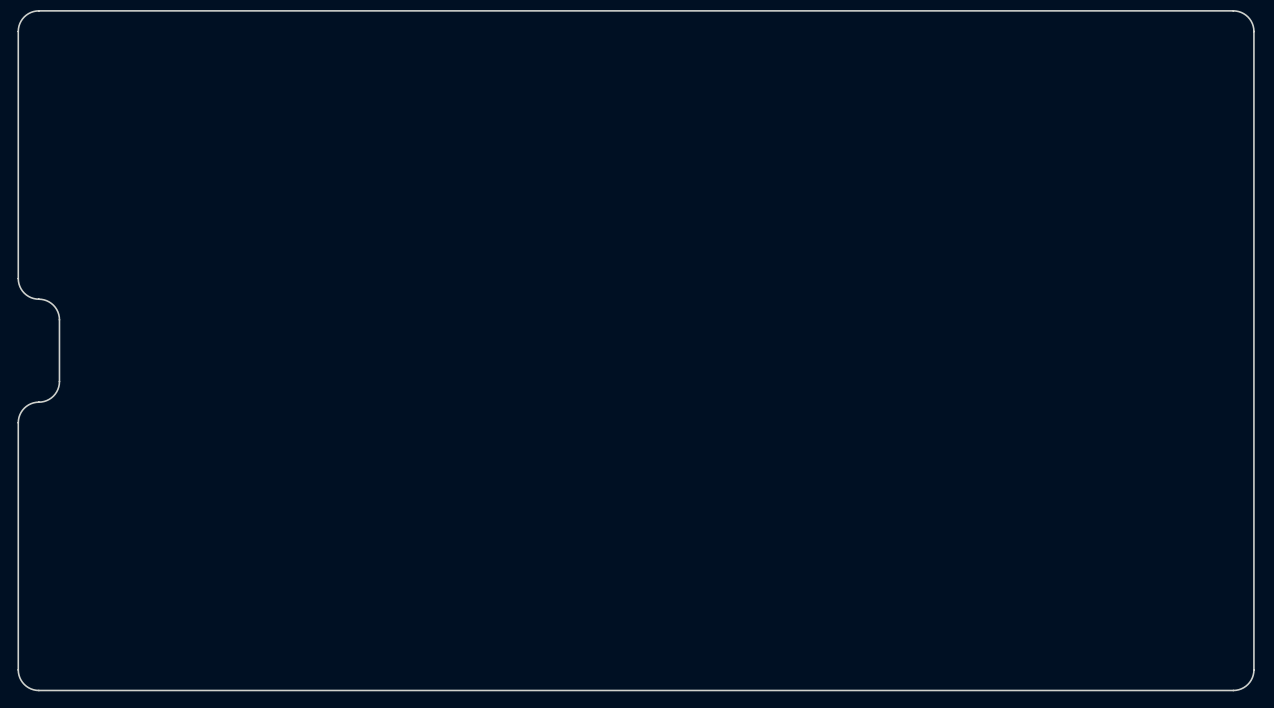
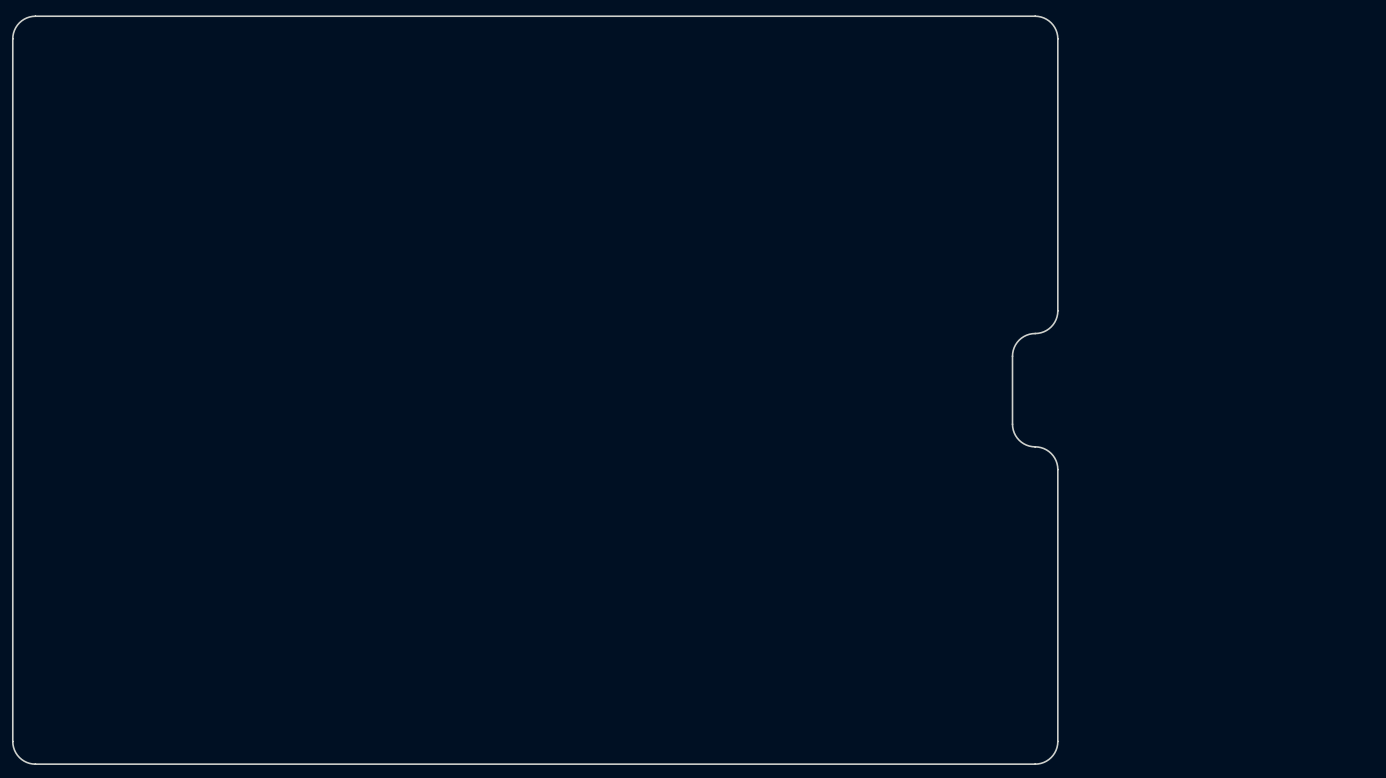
board edge: (947, 10) (1236, 11) (1247, 16) (1252, 23) (1253, 31) (1253, 669) (1252, 677) (1243, 687) (1233, 690) (947, 690) -> (1035, 16) (1043, 17) (1051, 22) (1056, 30) (1057, 38) (1057, 313) (1054, 322) (1048, 328) (1041, 332) (1026, 335) (1019, 340) (1014, 347) (1012, 356) (1012, 424) (1014, 432) (1023, 443) (1048, 451) (1056, 460) (1057, 469) (1057, 744) (1051, 757) (1043, 762) (1035, 764)
board edge: (18, 278) (19, 286) (24, 293) (30, 297) (51, 303) (56, 309) (59, 319) (57, 389) (49, 399) (26, 406) (21, 412) (18, 422) -> (12, 310) (12, 469)

